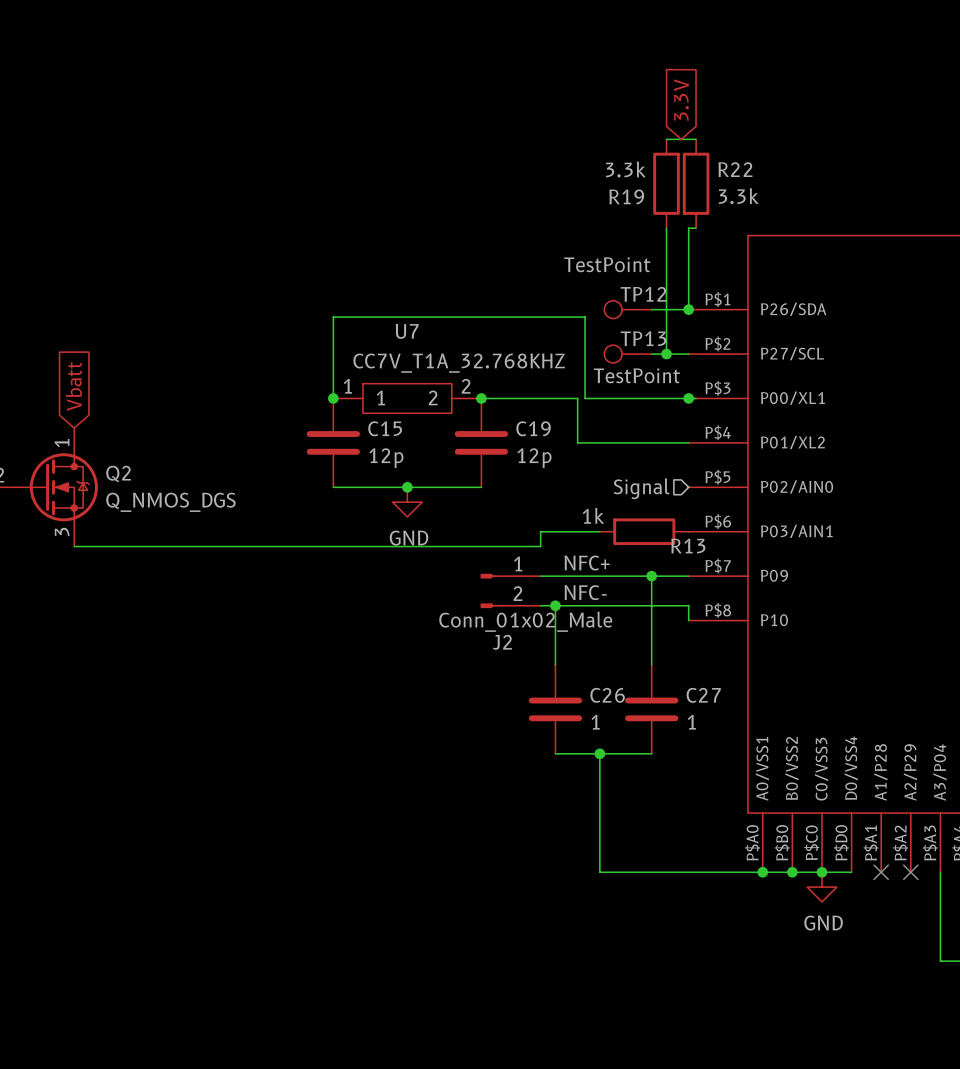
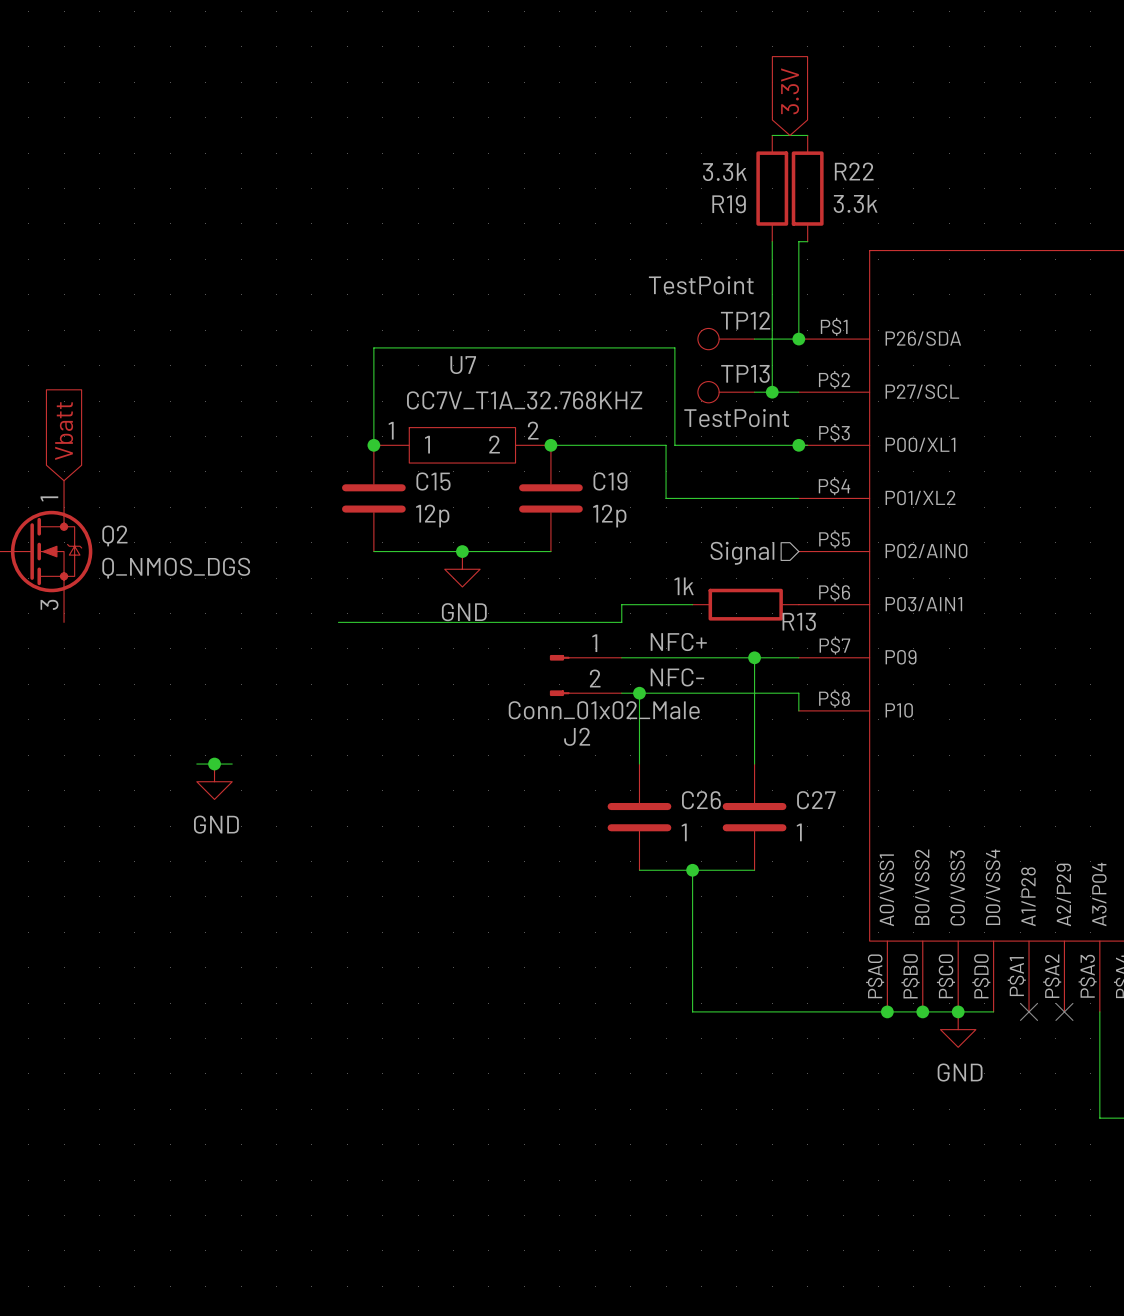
wire: (74, 546) (303, 546) -> none
wire: none -> (196, 764) (232, 764)
junction: none -> (214, 764)
power symbol: none -> GND (214, 781)

